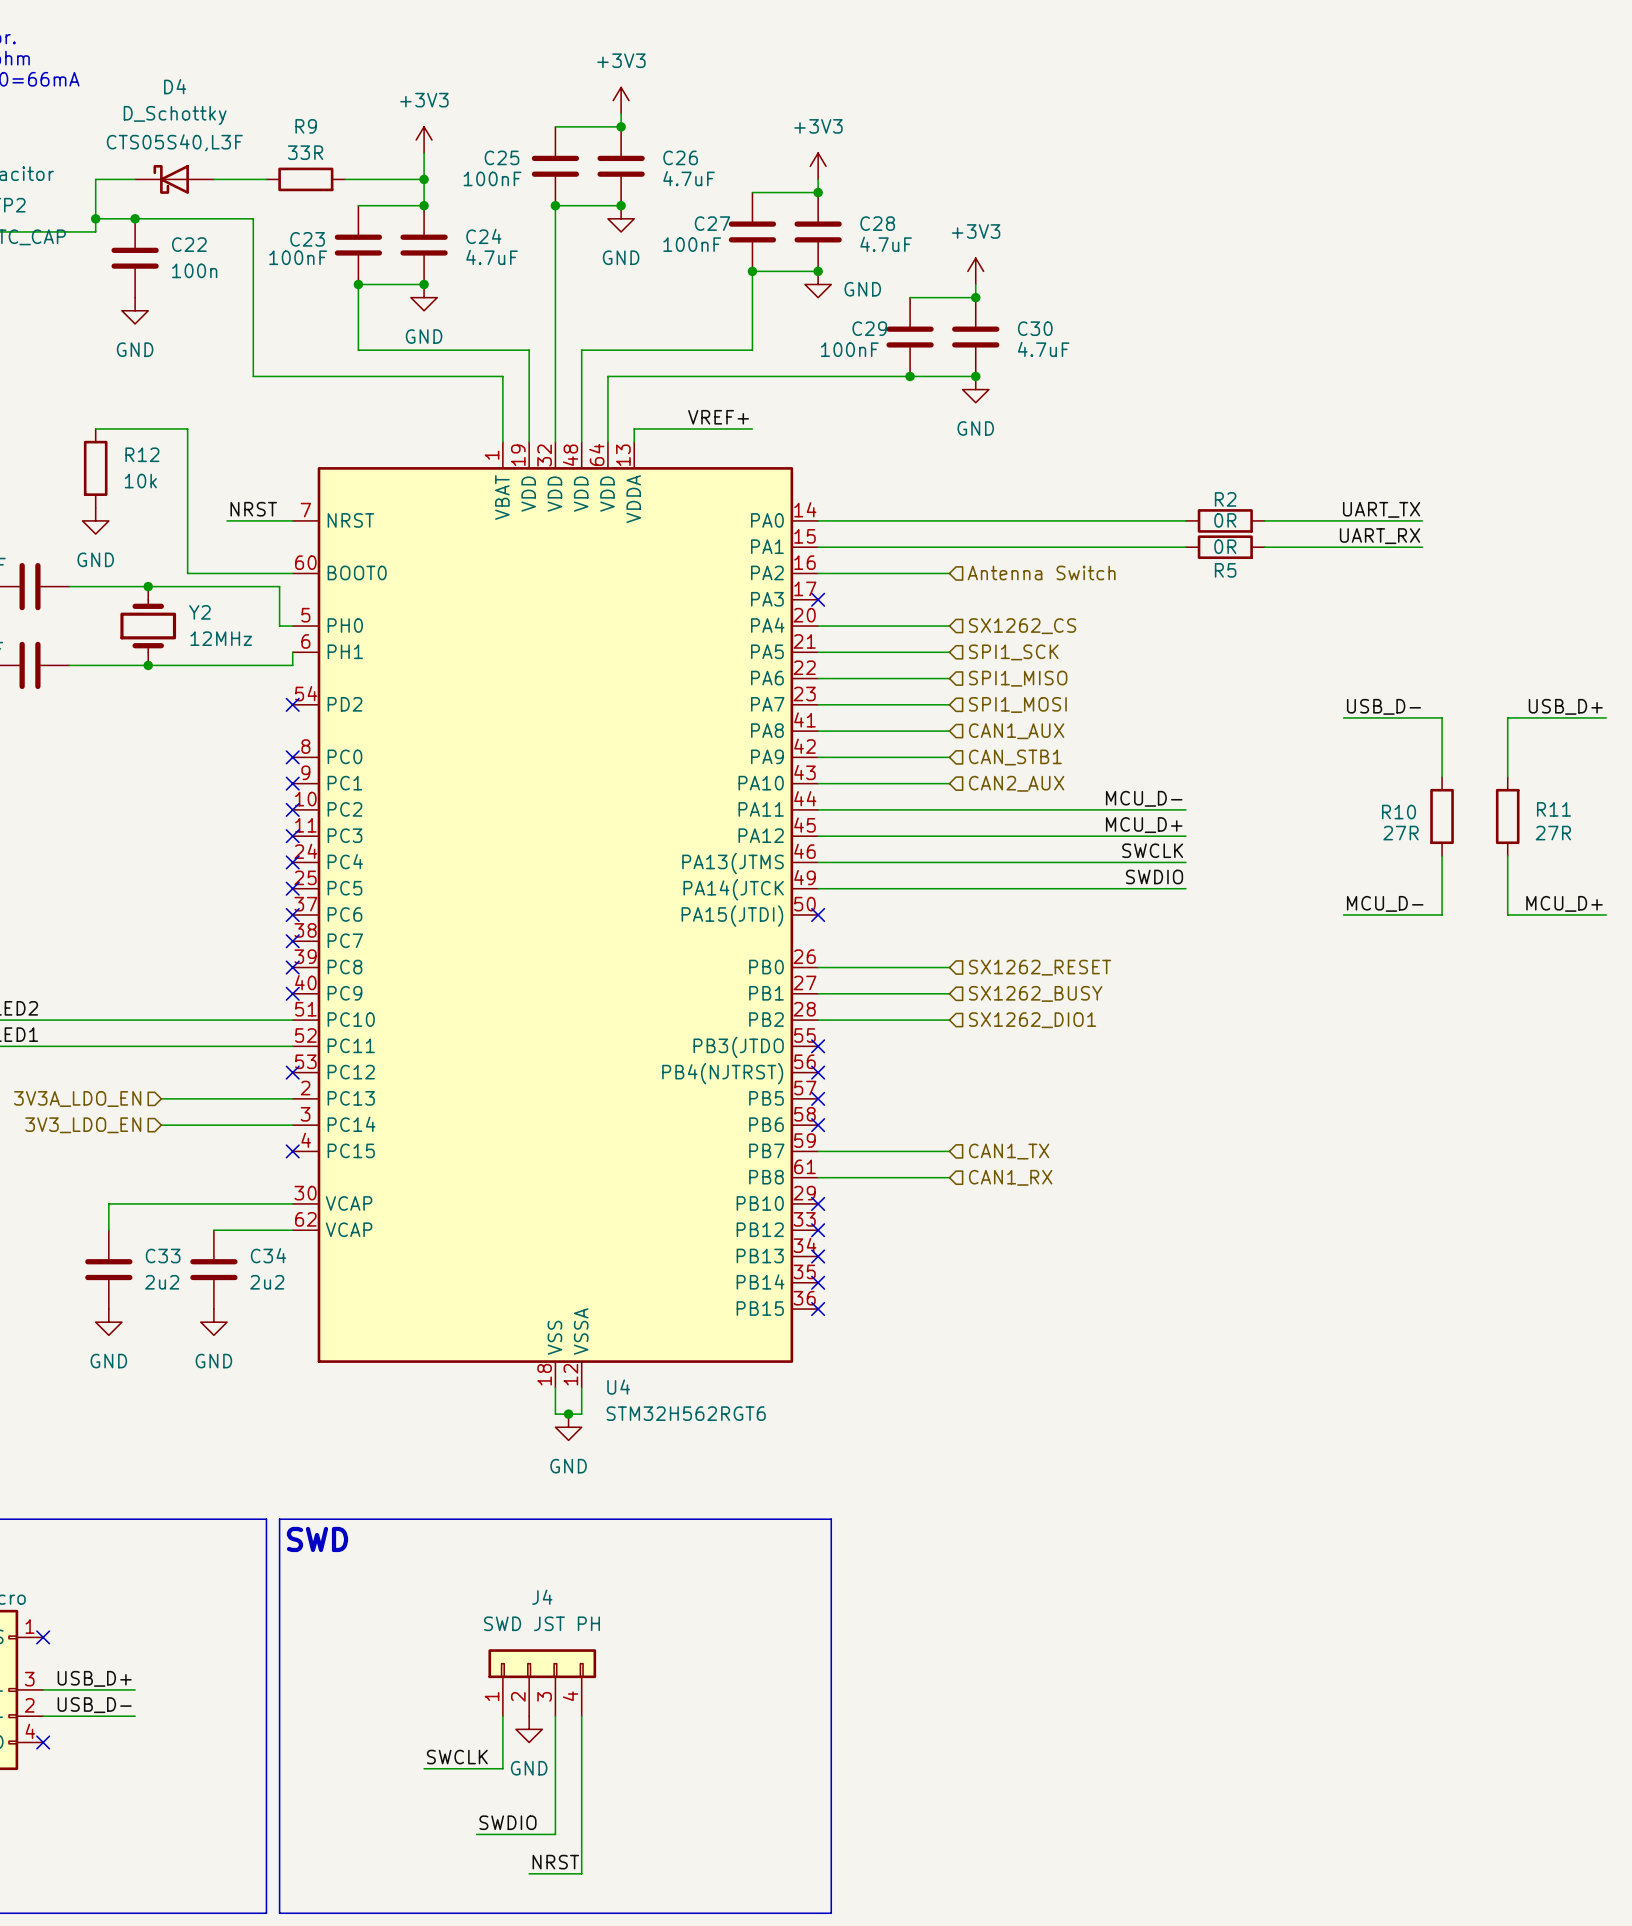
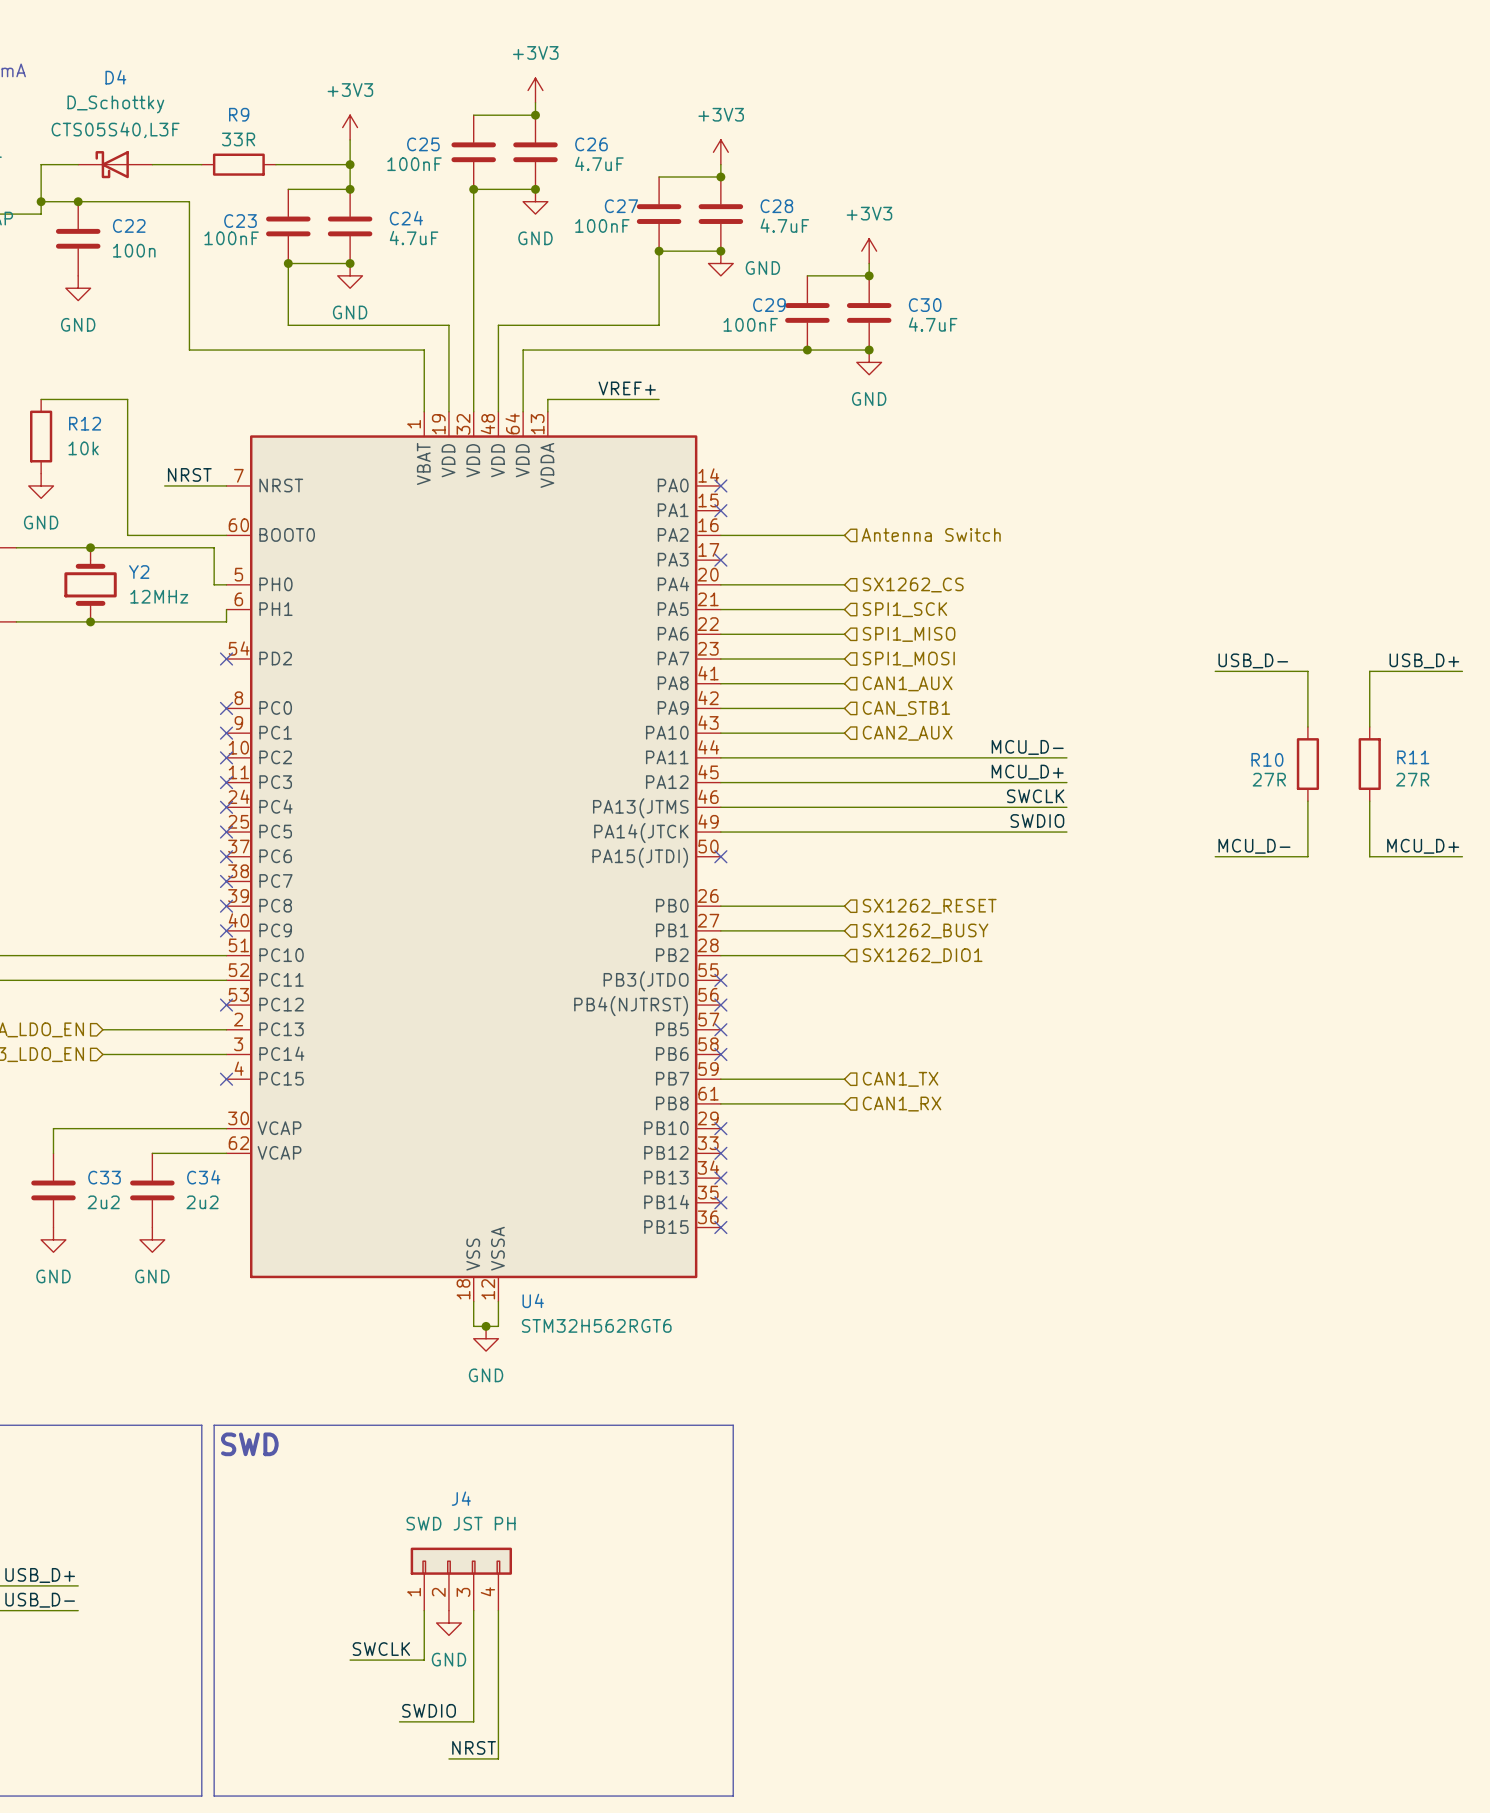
label: UART_TX (1381, 509) -> none
wire: (818, 520) (1185, 520) -> none
no-connect mark: none -> (720, 485)
R2: 0R (1225, 520) -> none
wire: (1264, 520) (1422, 520) -> none
label: UART_RX (1380, 536) -> none
wire: (818, 547) (1185, 547) -> none
no-connect mark: none -> (720, 510)
R5: 0R (1225, 547) -> none
wire: (1264, 547) (1422, 547) -> none

